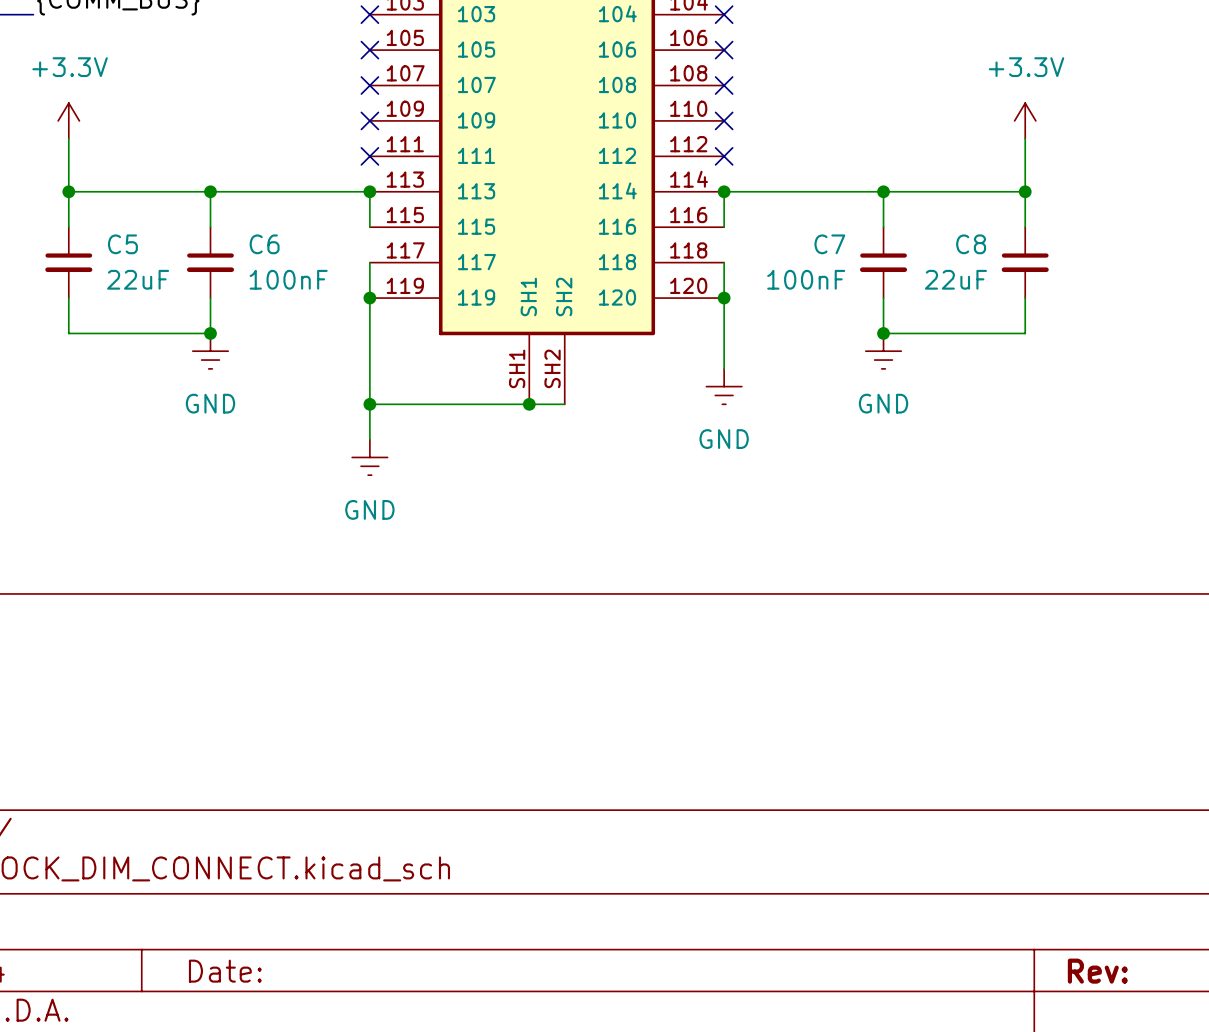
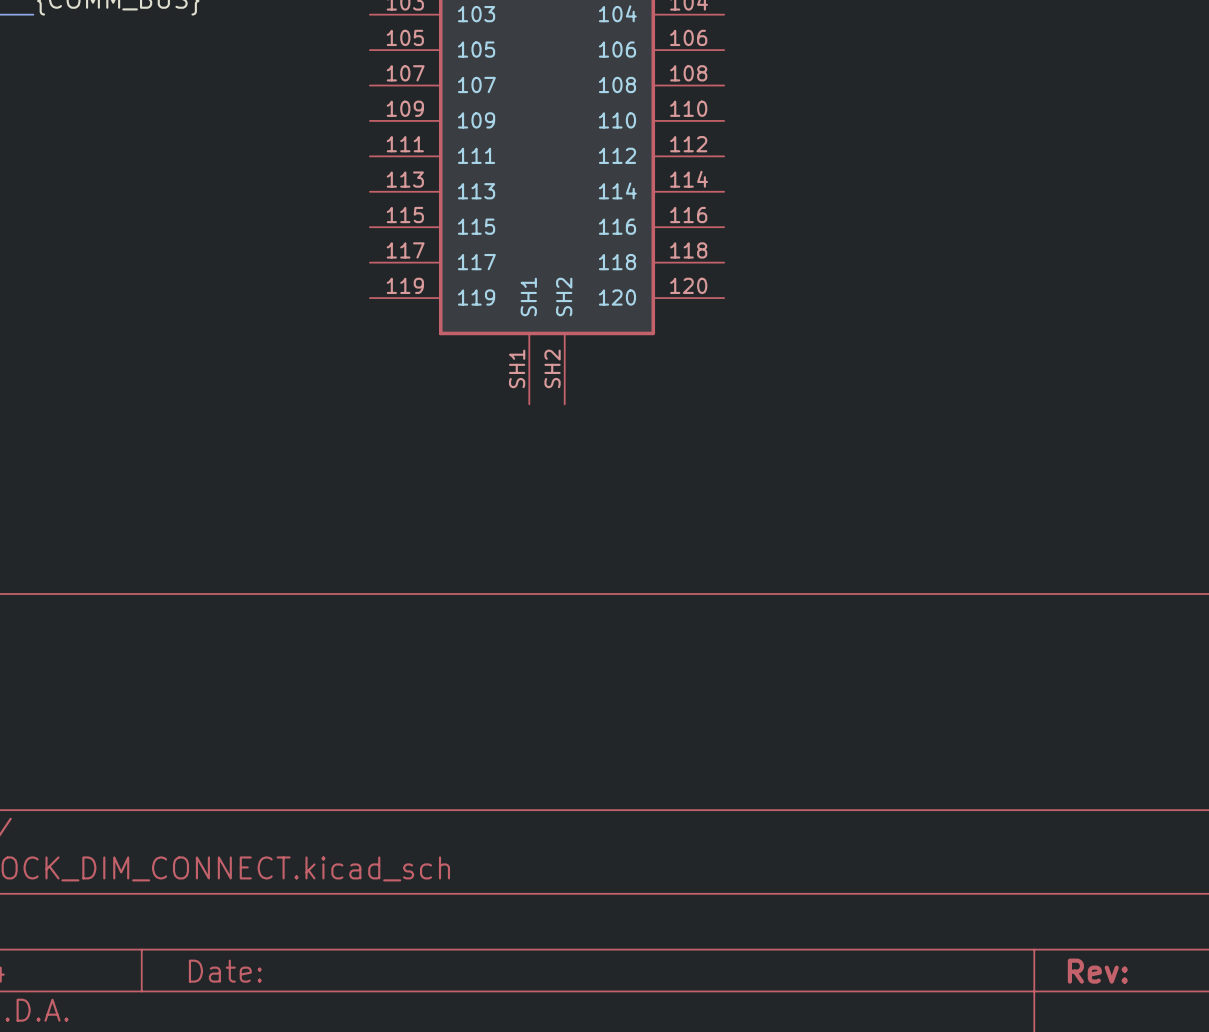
no-connect mark: (369, 14) -> none
no-connect mark: (724, 14) -> none
no-connect mark: (369, 50) -> none
no-connect mark: (724, 50) -> none
no-connect mark: (369, 85) -> none
no-connect mark: (724, 85) -> none
power symbol: +3.3V (68, 120) -> none
no-connect mark: (369, 120) -> none
no-connect mark: (724, 120) -> none
power symbol: +3.3V (1025, 120) -> none
wire: (68, 138) (68, 227) -> none
wire: (1025, 138) (1025, 227) -> none
no-connect mark: (369, 156) -> none
no-connect mark: (724, 156) -> none
wire: (68, 191) (369, 191) (369, 227) -> none
junction: (68, 191) -> none
wire: (210, 191) (210, 227) -> none
junction: (210, 191) -> none
junction: (369, 191) -> none
junction: (724, 191) -> none
wire: (883, 191) (883, 227) -> none
junction: (883, 191) -> none
wire: (1025, 191) (724, 191) (724, 227) -> none
junction: (1025, 191) -> none
C5: 22uF (68, 262) -> none
C6: 100nF (210, 262) -> none
wire: (369, 262) (369, 439) -> none
wire: (724, 262) (724, 368) -> none
C7: 100nF (883, 262) -> none
C8: 22uF (1025, 262) -> none
wire: (68, 298) (68, 333) (210, 333) (210, 298) -> none
junction: (369, 298) -> none
junction: (724, 298) -> none
wire: (883, 298) (883, 333) (1025, 333) (1025, 298) -> none
junction: (210, 333) -> none
junction: (883, 333) -> none
power symbol: GND (210, 351) -> none
power symbol: GND (883, 351) -> none
power symbol: GND (724, 386) -> none
wire: (369, 404) (564, 404) -> none
junction: (369, 404) -> none
junction: (529, 404) -> none
power symbol: GND (369, 457) -> none

